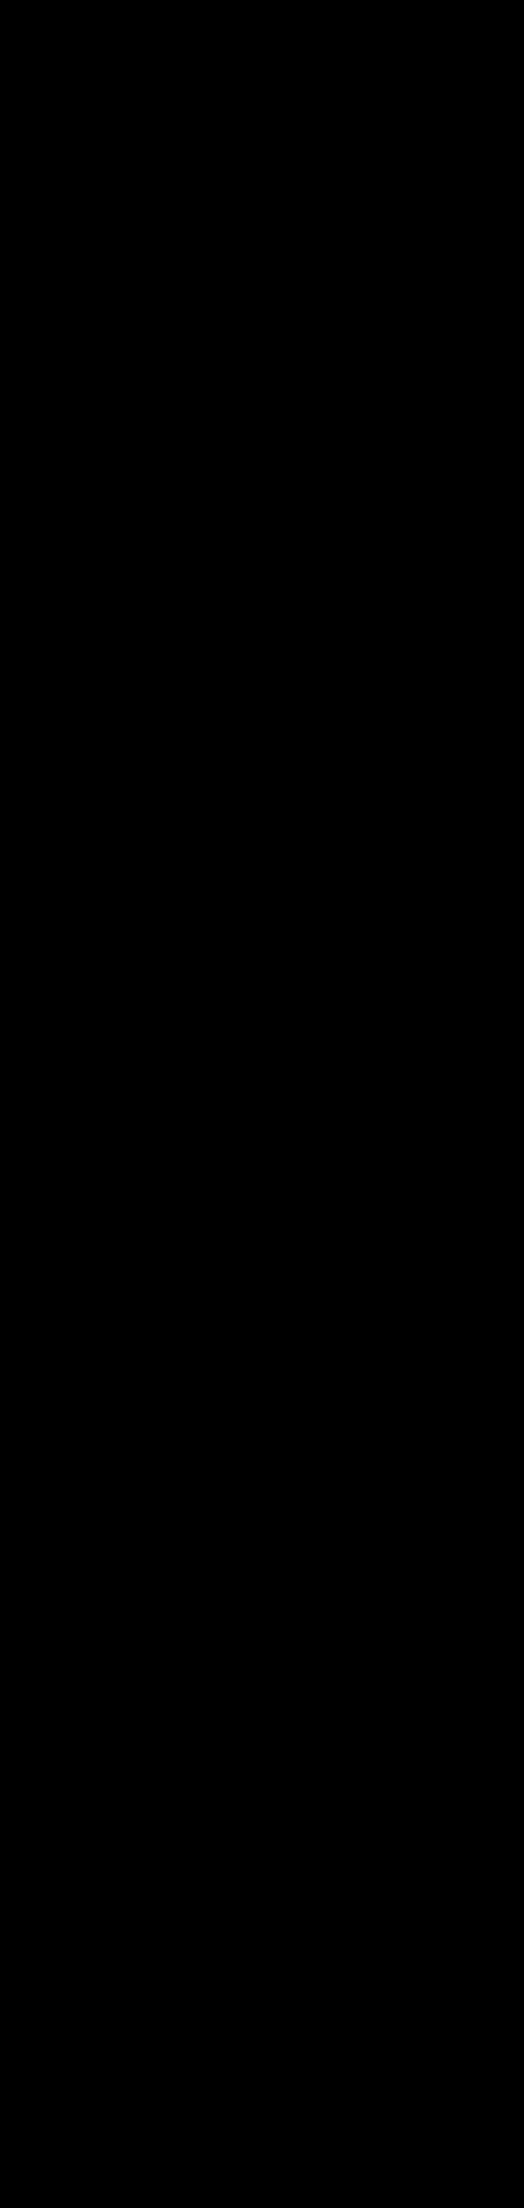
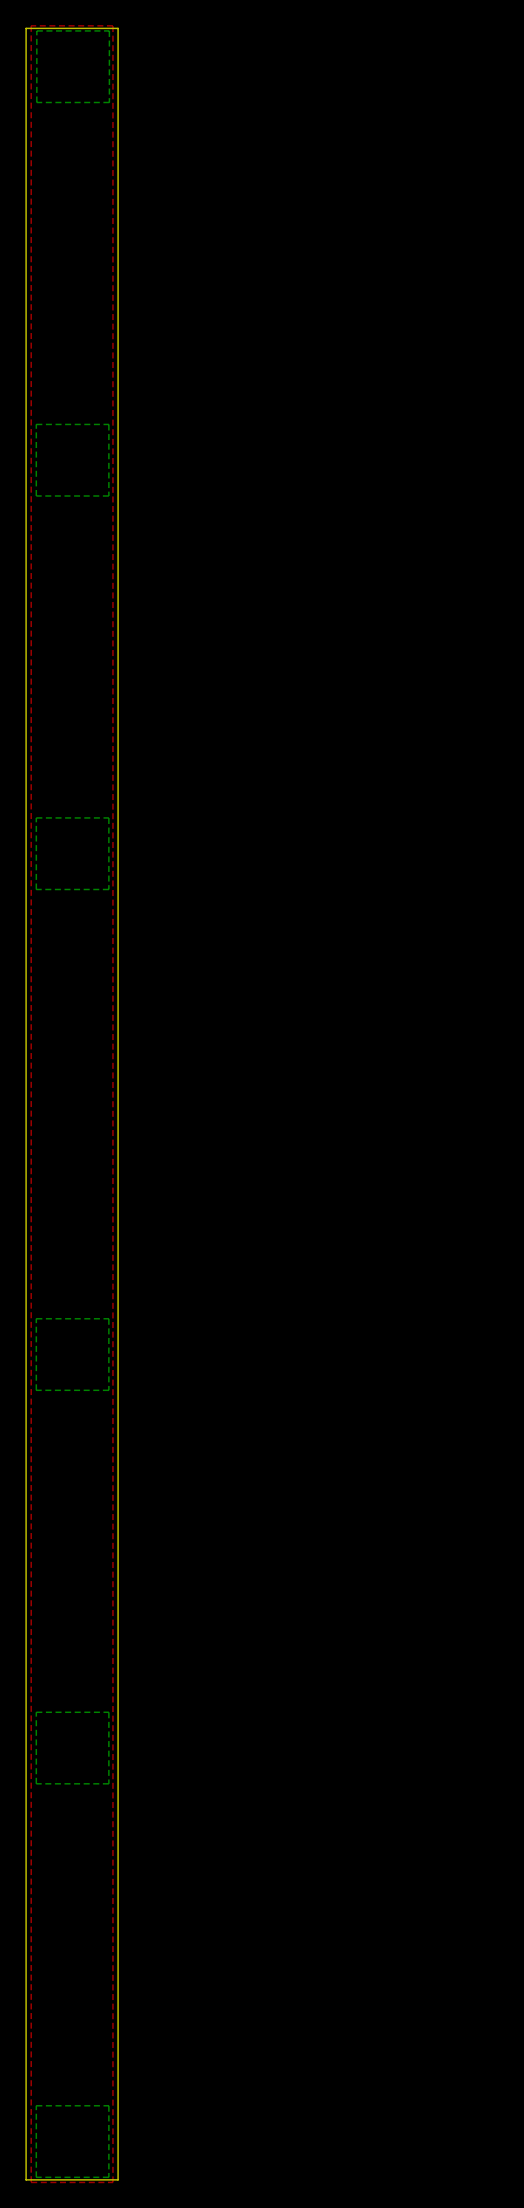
top zone outline: none -> (31, 25) (31, 2182) (112, 2182) (112, 25) (31, 25)
board edge: none -> (26, 28) (118, 28) (118, 2179) (26, 2179) (26, 28)
bottom zone outline: none -> (36, 30) (109, 30) (109, 102) (36, 102) (36, 30)
bottom zone outline: none -> (36, 424) (36, 495) (108, 495) (108, 424) (36, 424)
bottom zone outline: none -> (36, 817) (36, 889) (108, 889) (108, 817) (36, 817)
bottom zone outline: none -> (36, 1318) (36, 1390) (108, 1390) (108, 1318) (36, 1318)
bottom zone outline: none -> (36, 1712) (36, 1783) (108, 1783) (108, 1712) (36, 1712)
bottom zone outline: none -> (36, 2105) (36, 2177) (108, 2177) (108, 2105) (36, 2105)

